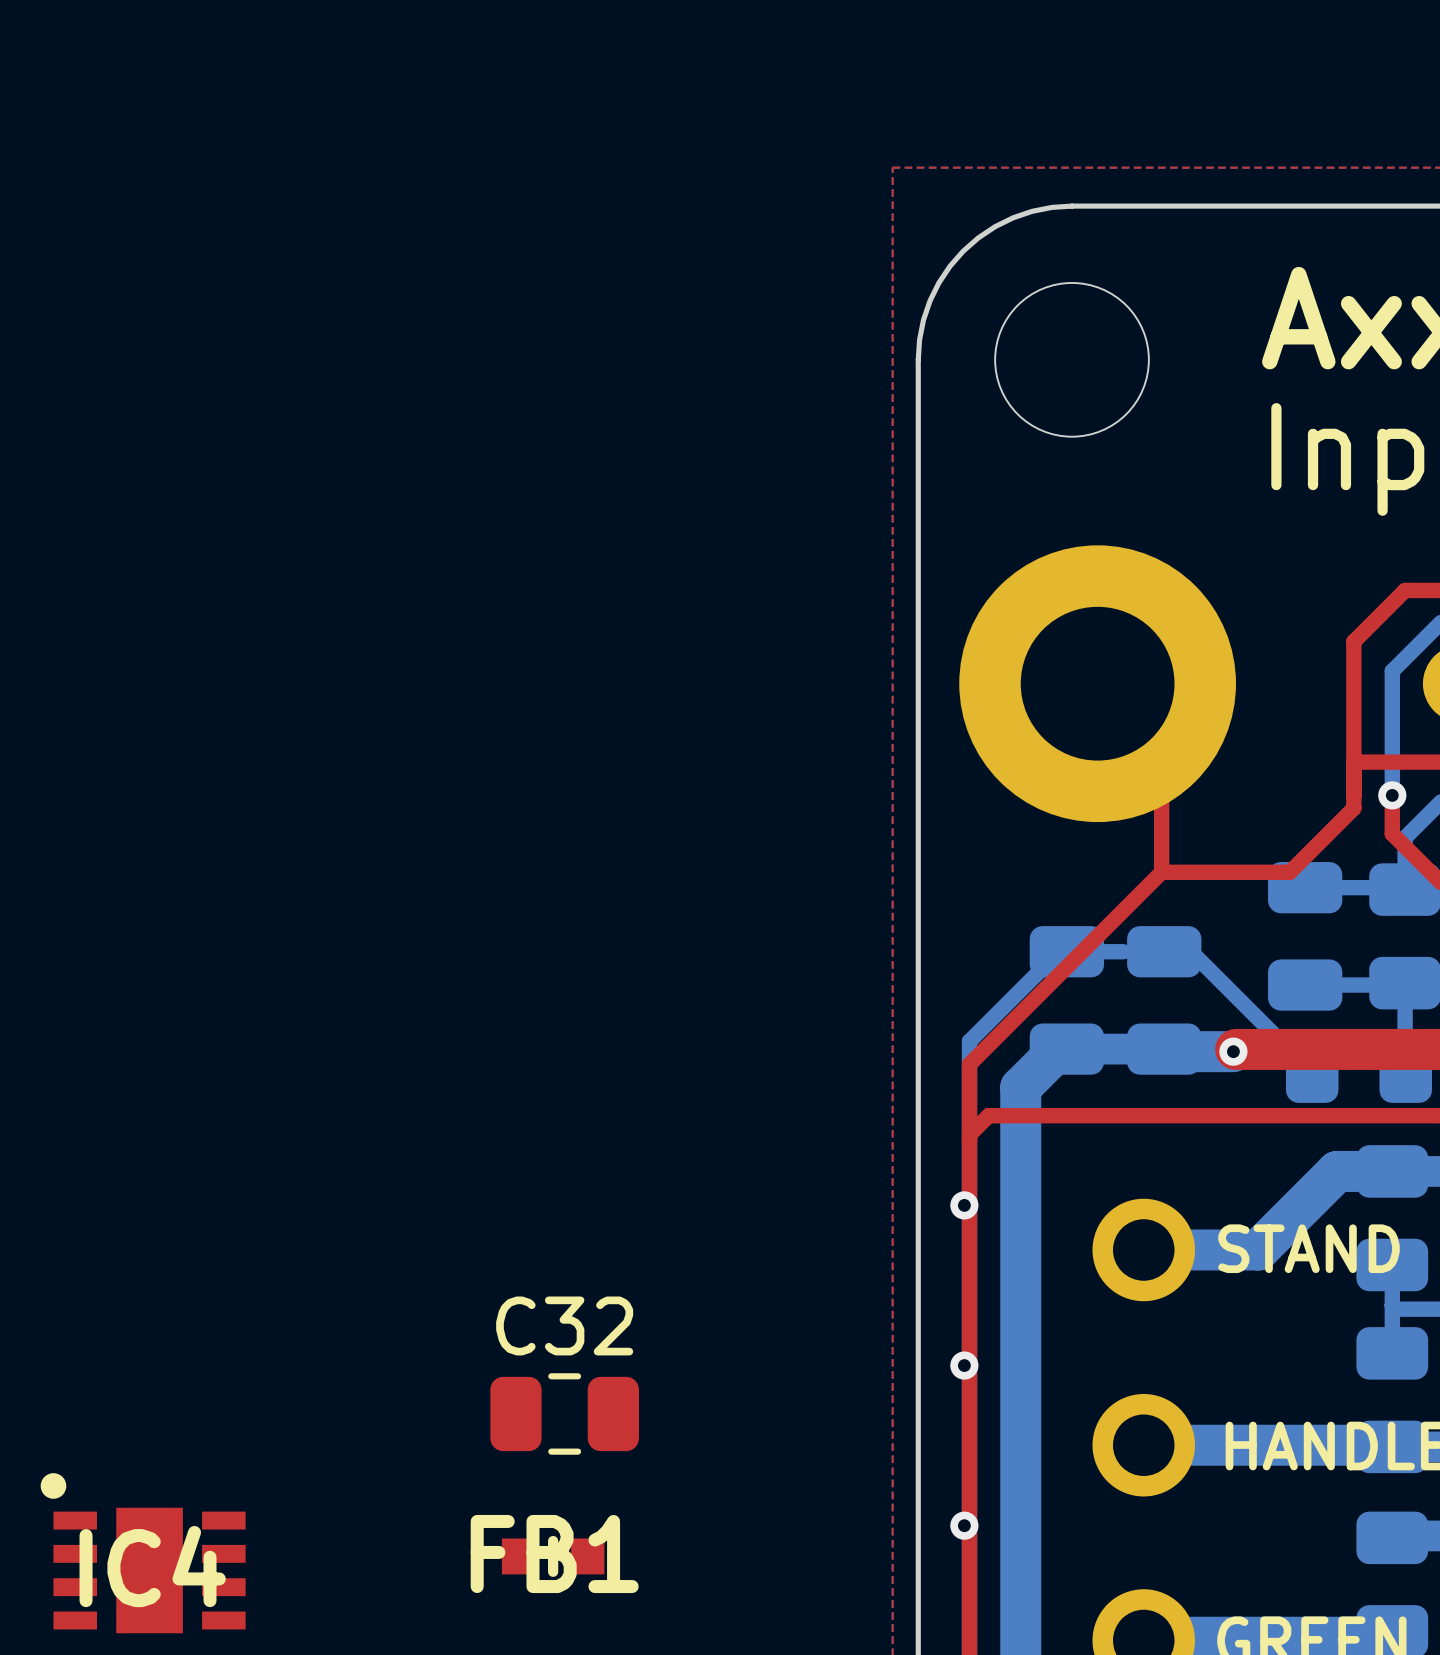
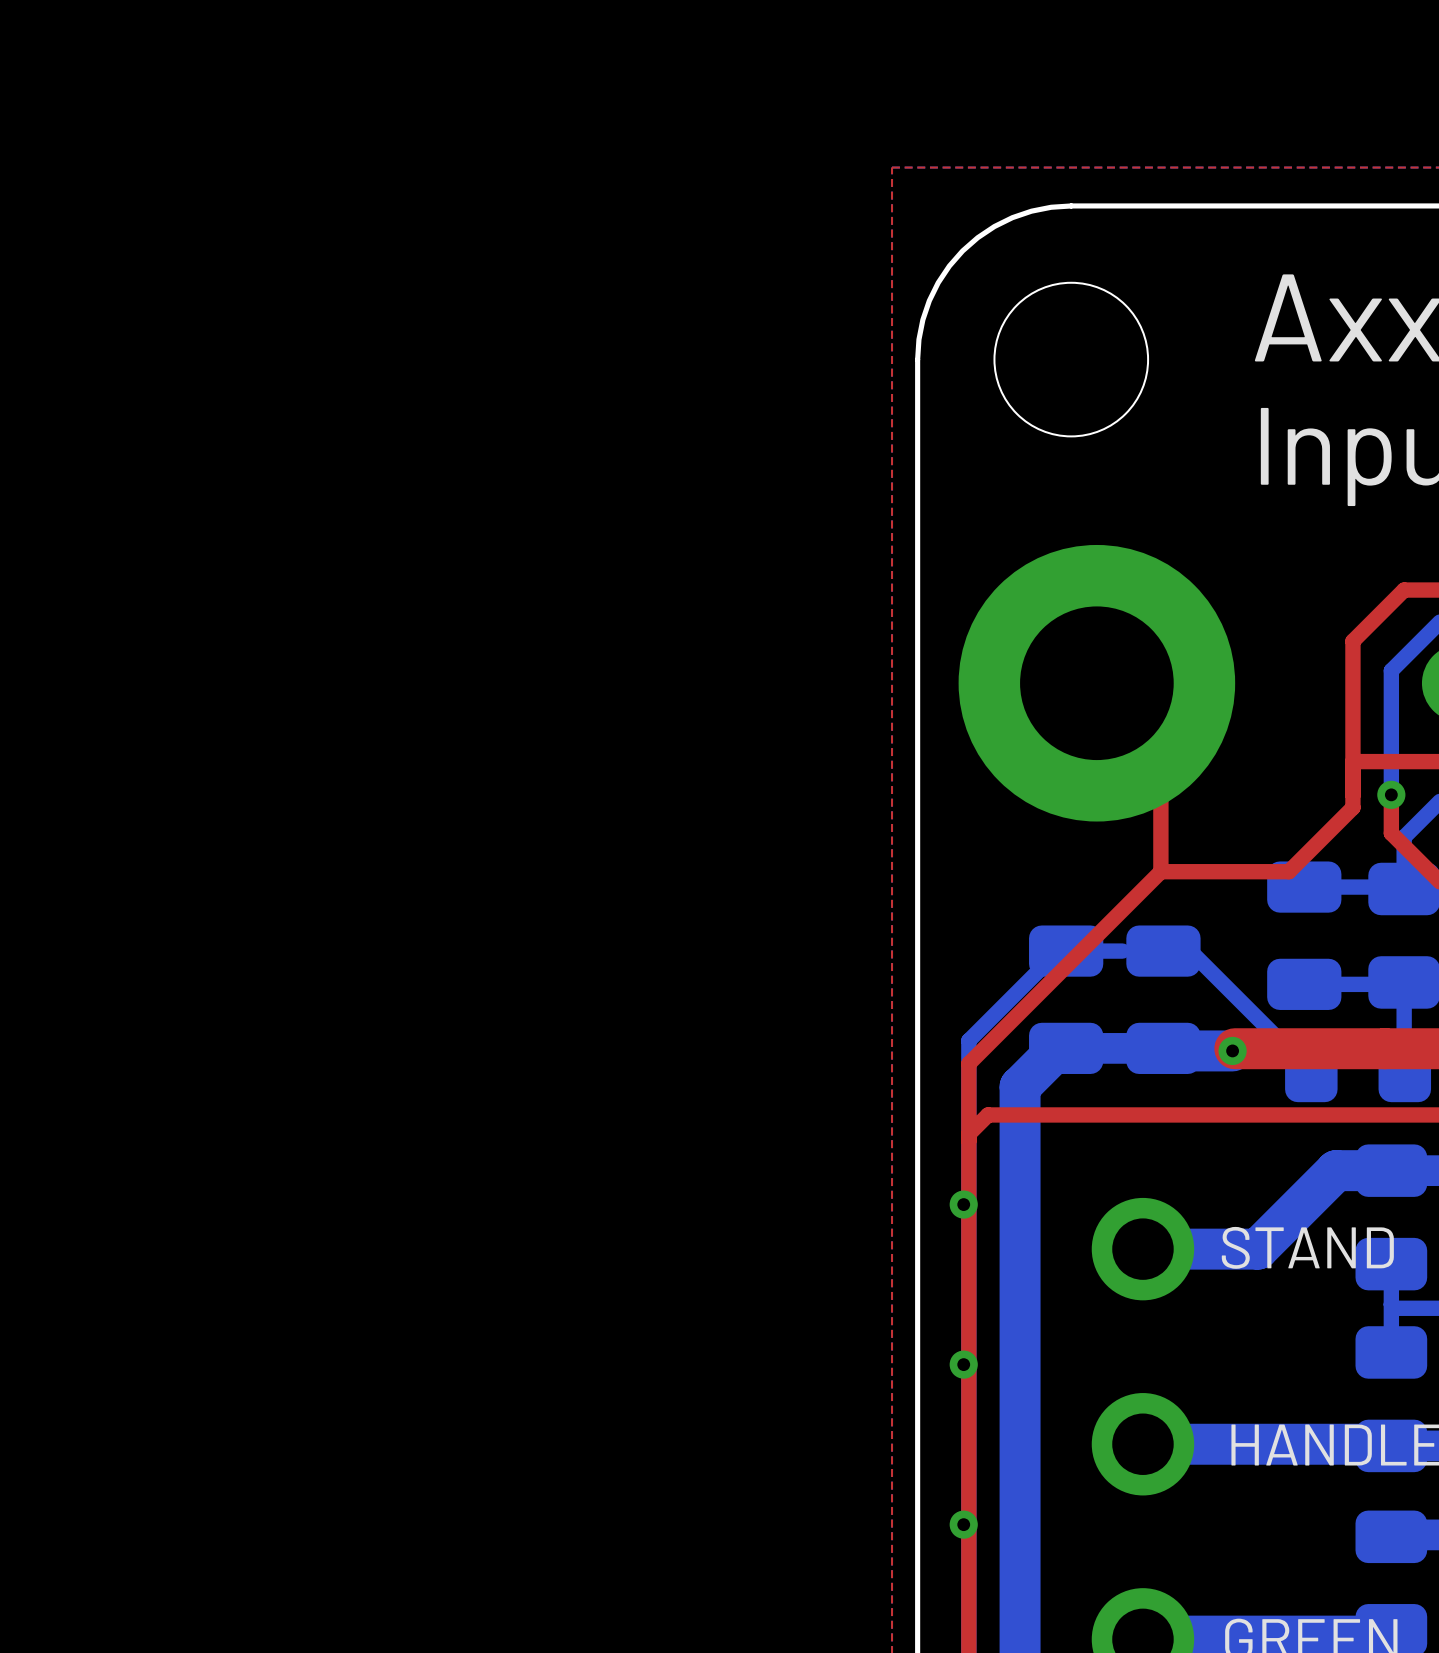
C32: (564, 1413) -> none
IC4: (143, 1553) -> none
FB1: (553, 1556) -> none

